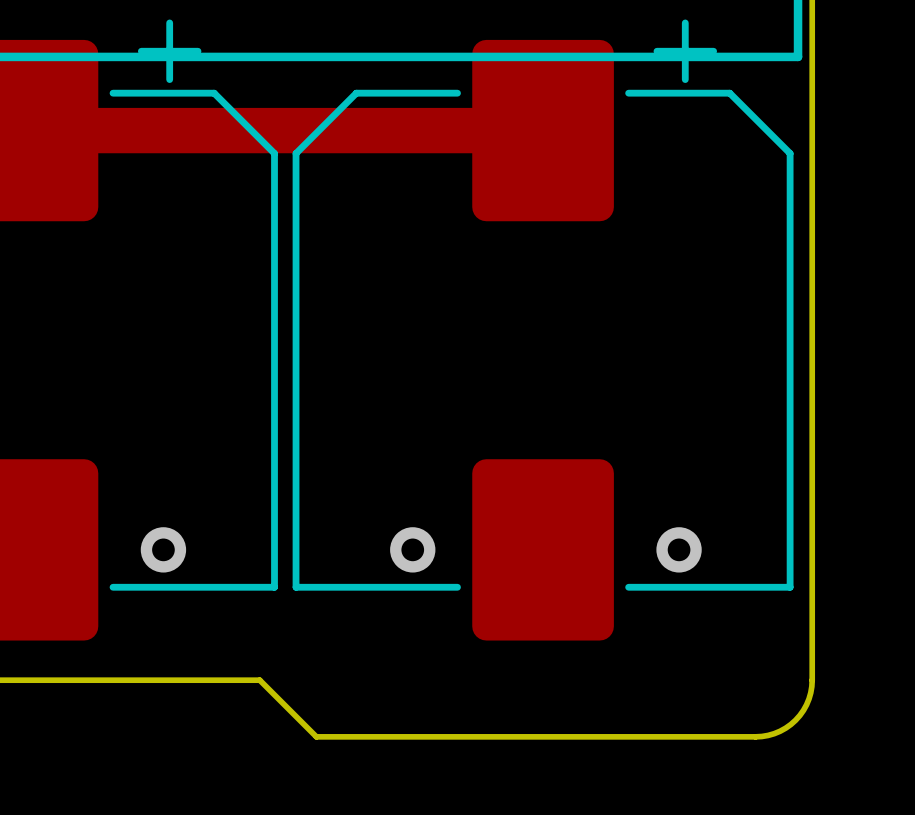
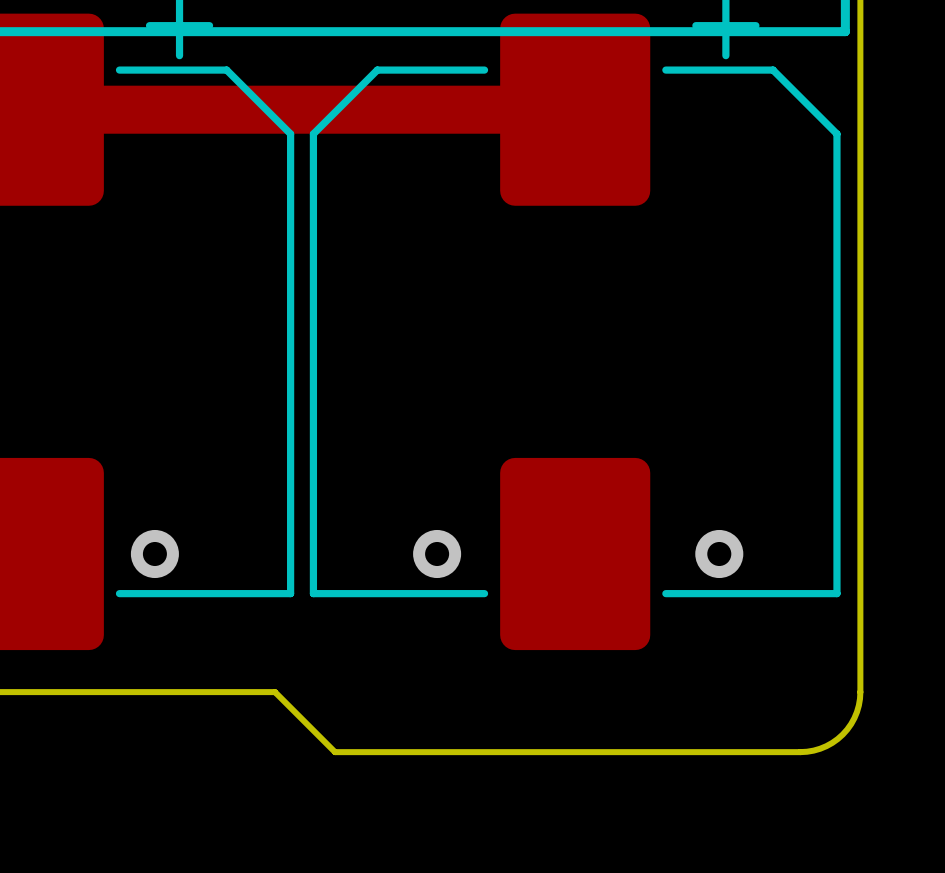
via position: (163, 549) -> (154, 554)

